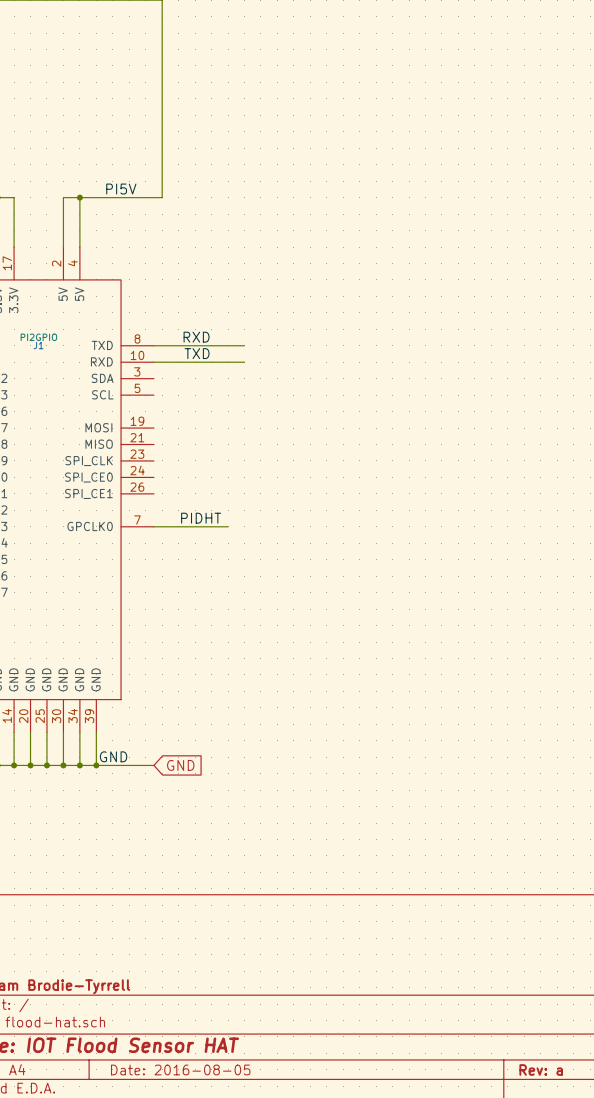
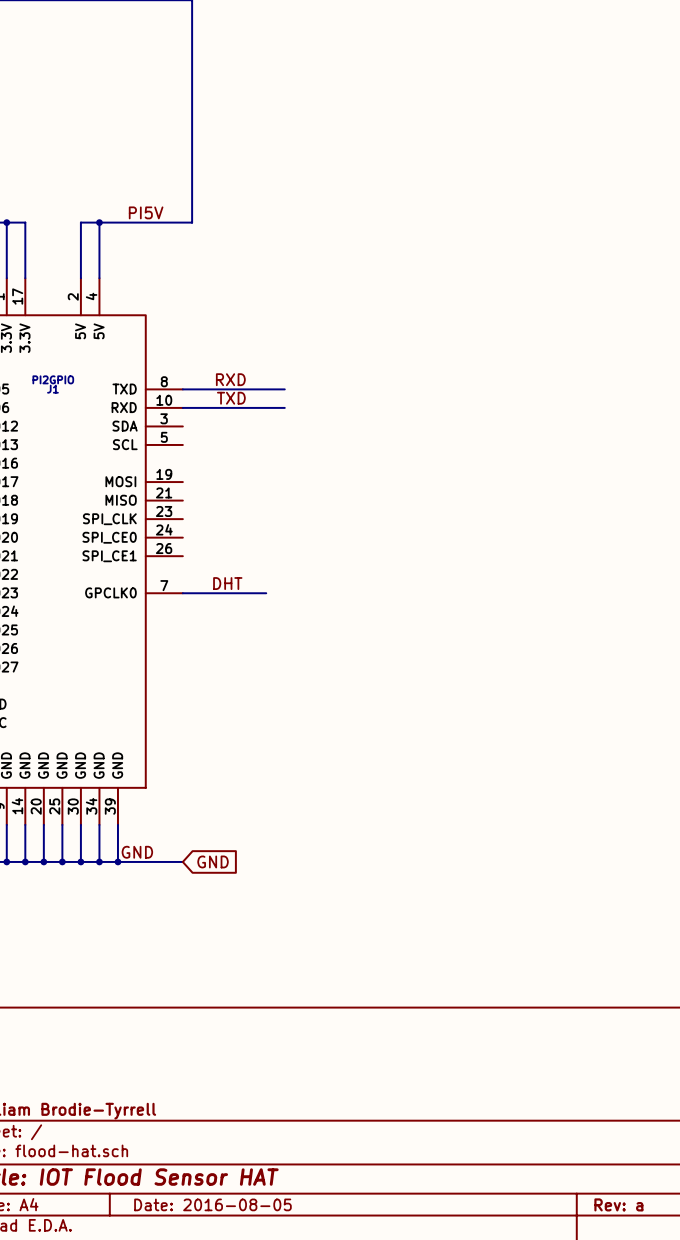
label: PIDHT (201, 518) -> DHT (227, 583)

